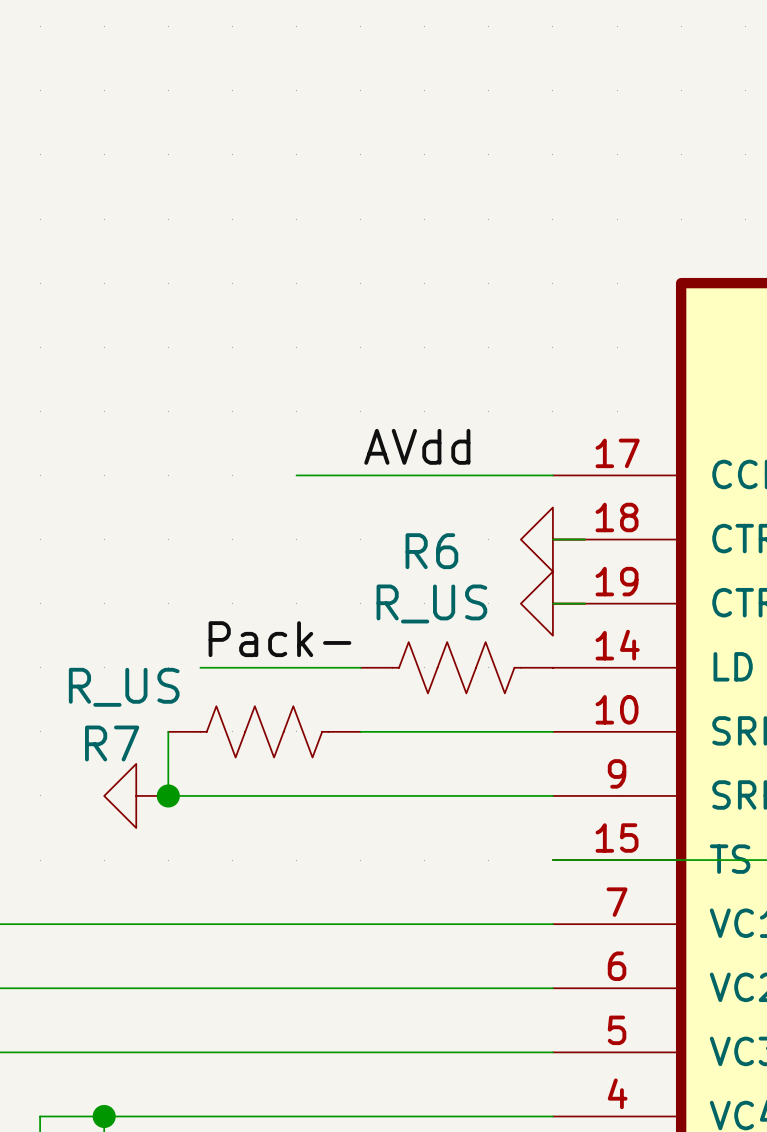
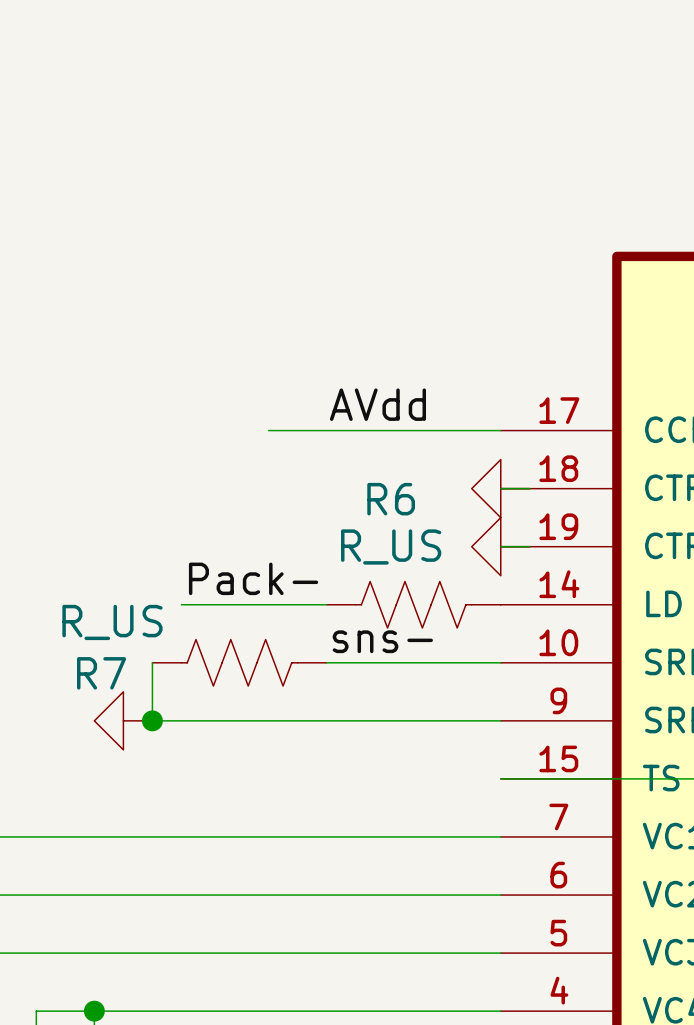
label: none -> sns- (382, 641)

